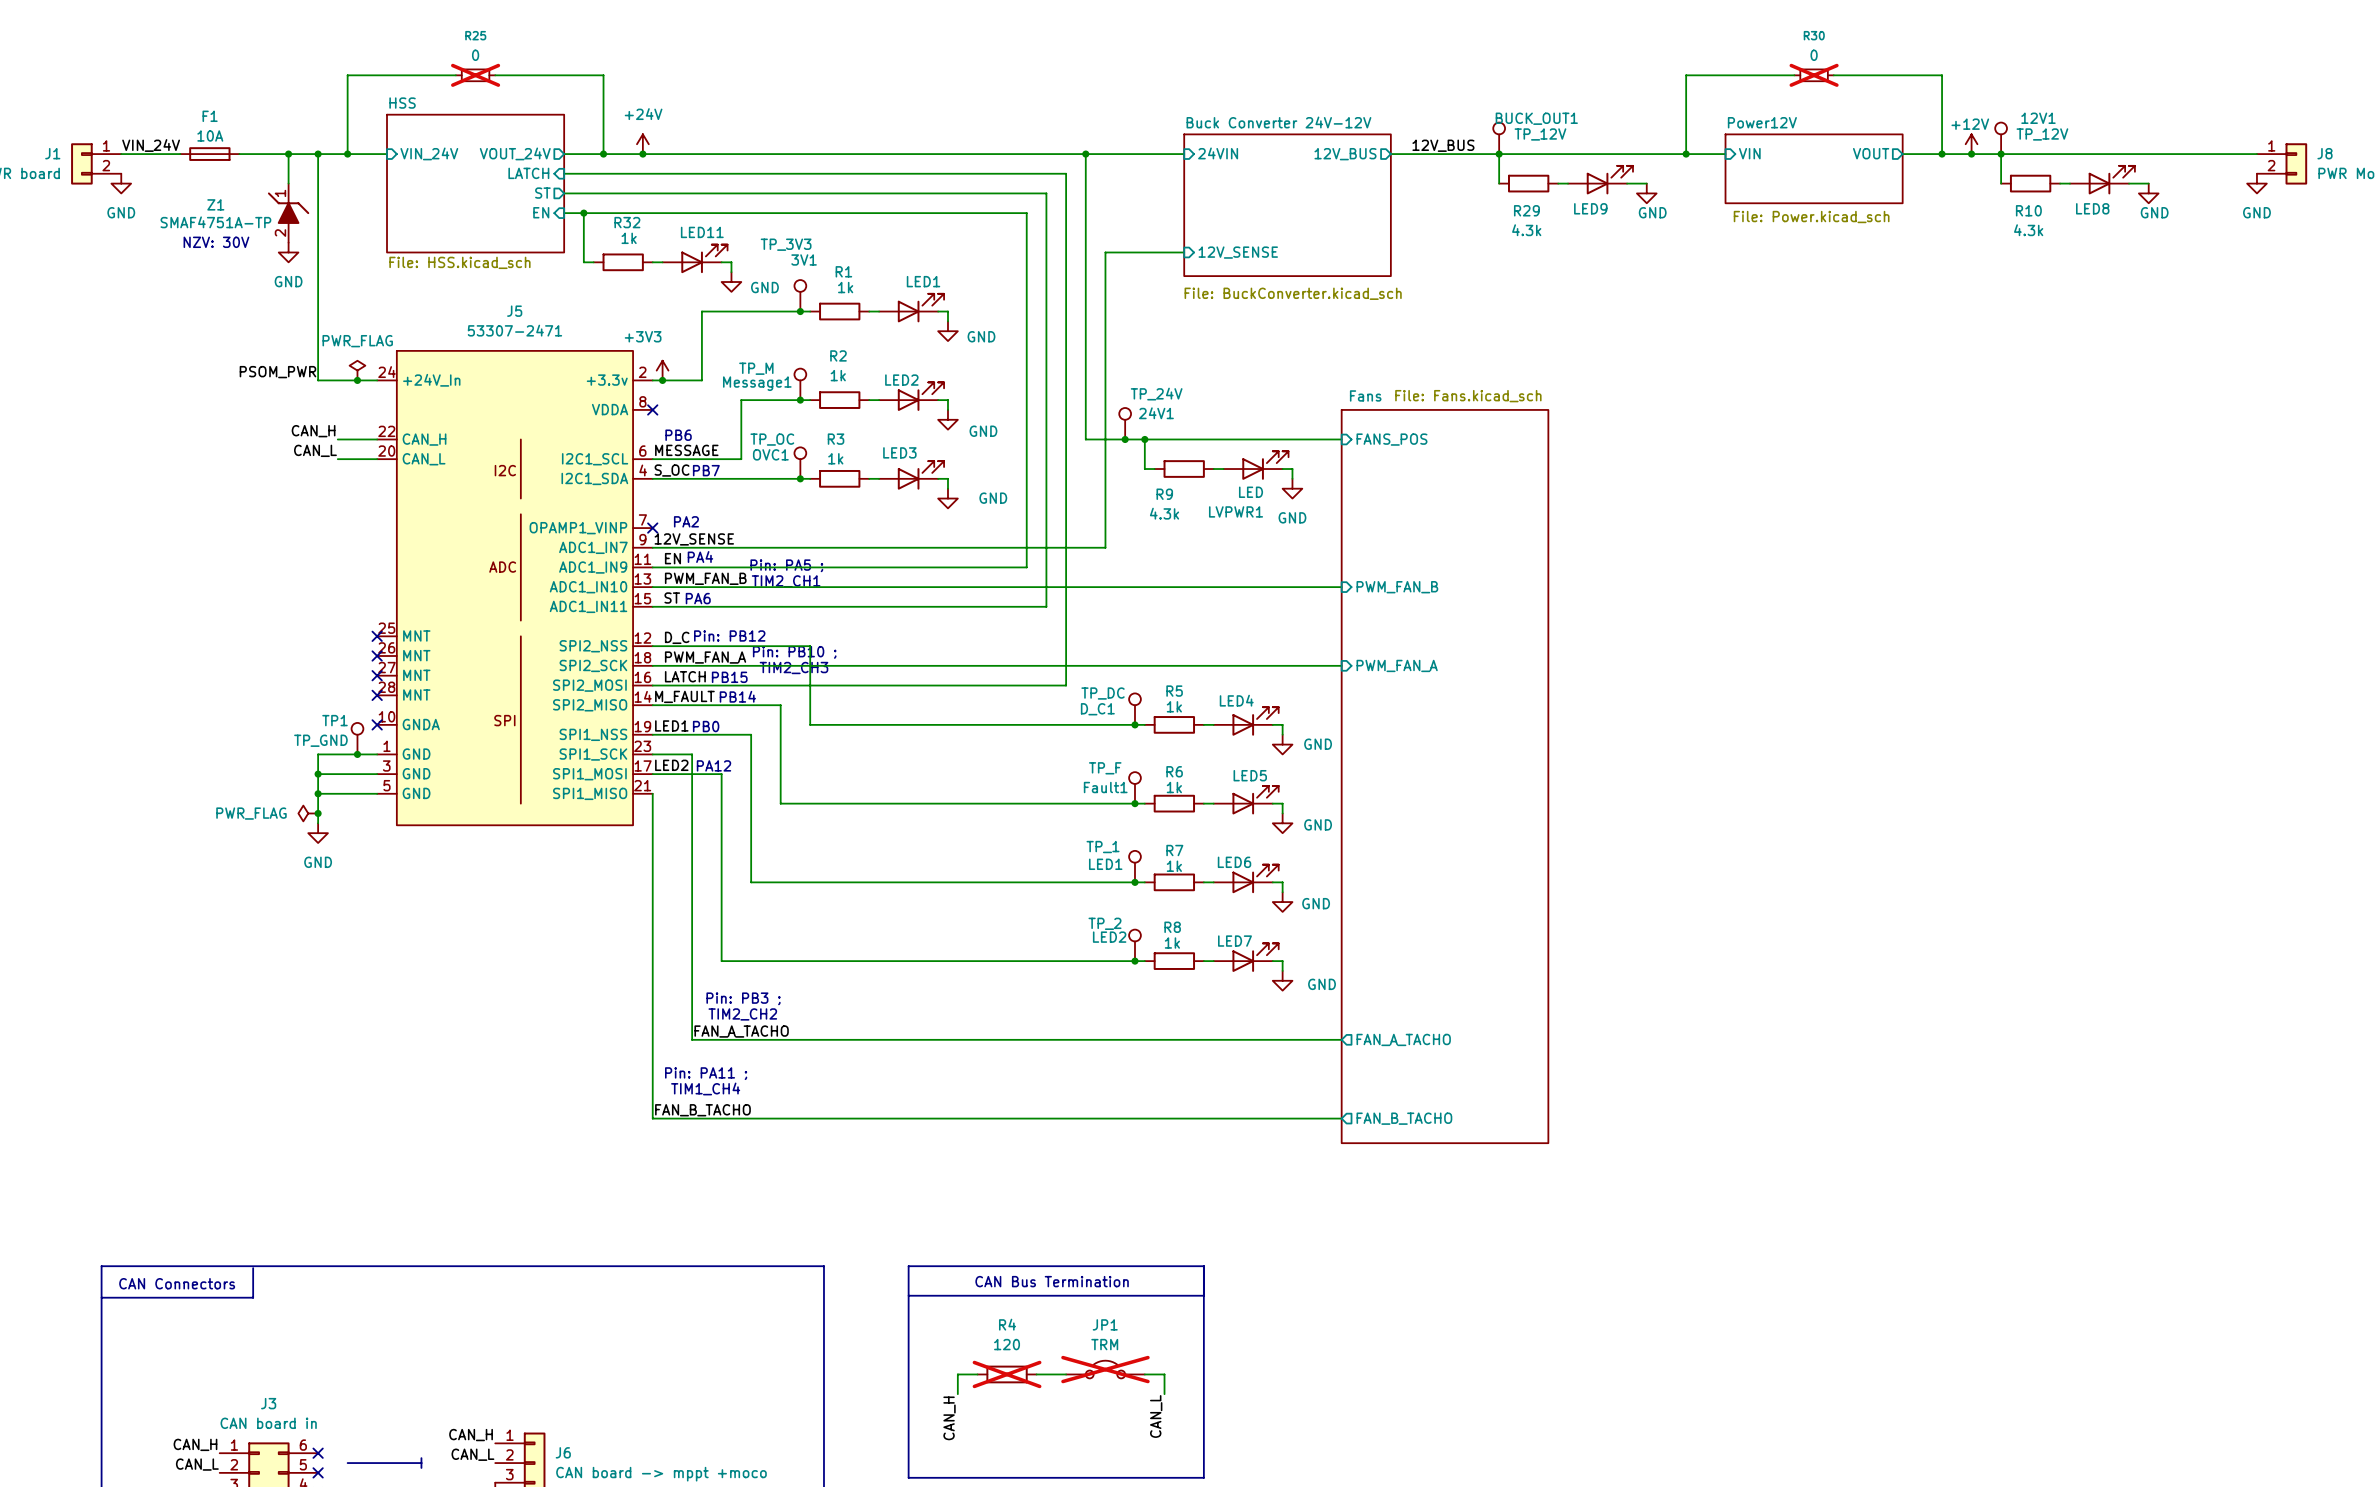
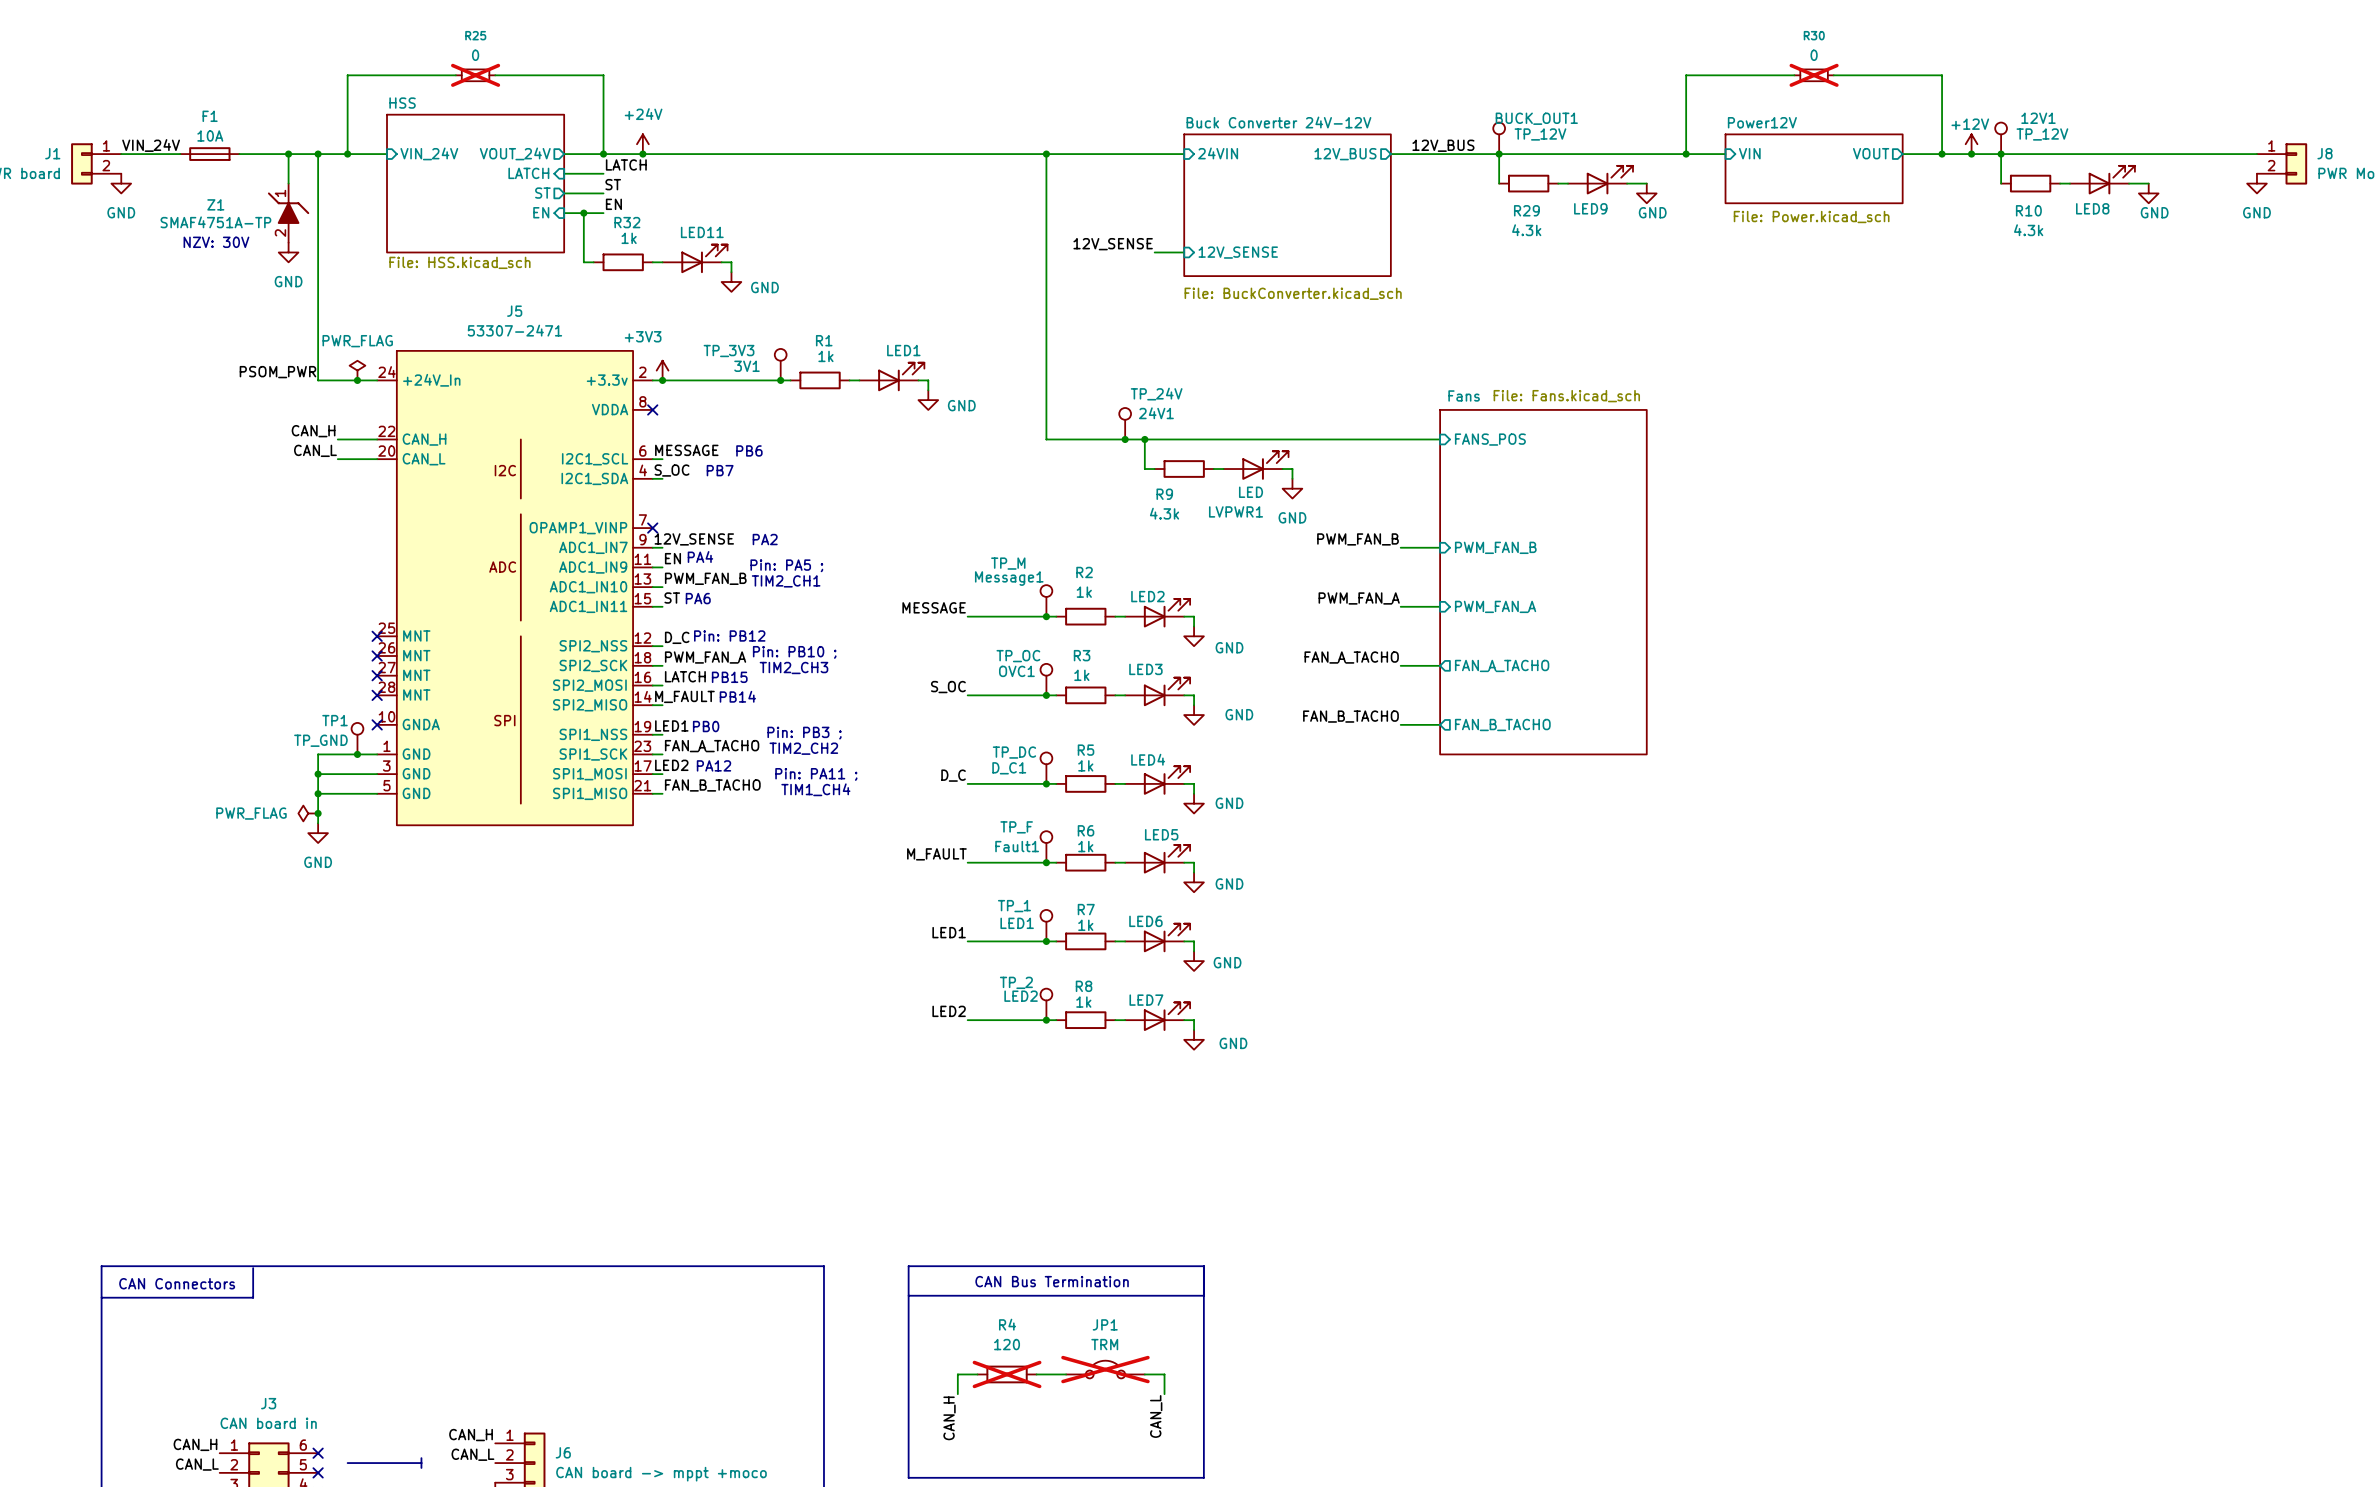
wire: (1085, 154) (1085, 439) -> (1046, 439) (1085, 439)
junction position: (1085, 154) -> (1046, 154)
label: none -> LATCH (626, 164)
wire: (603, 173) (1066, 173) (1066, 685) (662, 685) -> none
label: none -> ST (613, 184)
wire: (603, 193) (1046, 193) -> (1046, 154) (1046, 193)
label: none -> EN (613, 204)
wire: (603, 213) (1026, 213) (1026, 567) (662, 567) -> none
3V1 value position: TP_3V3 (786, 244) -> TP_3V3 (729, 351)
label: none -> 12V_SENSE (1113, 244)
wire: (1154, 252) (1105, 252) (1105, 547) (662, 547) -> none
3V1 name position: 3V1 (804, 259) -> 3V1 (746, 366)
3V1 position: (800, 295) -> (780, 364)
LED1 position: (911, 308) -> (891, 376)
junction: (800, 311) -> none
wire: (810, 311) (701, 311) (701, 380) -> (790, 380) (701, 380)
R1 position: (839, 311) -> (820, 380)
wire: (869, 311) (879, 311) -> none
wire: (938, 311) (947, 311) (947, 321) -> none
power symbol: GND (947, 331) -> none
Message1 value position: TP_M (756, 368) -> TP_M (1008, 563)
Message1 name position: Message1 (757, 383) -> Message1 (1009, 578)
Message1 position: (800, 384) -> (1046, 600)
LED2 position: (911, 396) -> (1157, 613)
junction position: (800, 400) -> (780, 380)
wire: (810, 400) (741, 400) (741, 459) (662, 459) -> none
R2 position: (839, 400) -> (1085, 616)
wire: (869, 400) (879, 400) -> (849, 380) (859, 380)
wire: (938, 400) (947, 400) (947, 409) -> (918, 380) (928, 380) (928, 390)
power symbol position: GND (947, 419) -> GND (928, 400)
power symbol text position: GND (983, 431) -> GND (961, 405)
text position: PB6 (678, 435) -> PB6 (749, 450)
wire: (1046, 439) (1046, 606) (662, 606) -> none
wire: none -> (1341, 439) (1440, 439)
sheet pin position: FANS_POS (1391, 439) -> FANS_POS (1490, 439)
OVC1 position: (800, 463) -> (1046, 679)
text position: PB7 (706, 470) -> PB7 (720, 470)
LED3 position: (911, 475) -> (1157, 691)
wire: (662, 478) (810, 478) -> none
junction: (800, 478) -> none
R3 position: (839, 478) -> (1085, 695)
wire: (869, 478) (879, 478) -> none
wire: (938, 478) (947, 478) (947, 488) -> none
power symbol: GND (947, 498) -> none
text position: PA2 (686, 521) -> PA2 (765, 539)
label: none -> PWM_FAN_B (1358, 539)
wire: none -> (1400, 547) (1440, 547)
sheet Fans: none -> File: Fans.kicad_sch (1543, 582)
wire: (662, 587) (1341, 587) -> none
sheet pin position: PWM_FAN_B (1397, 587) -> PWM_FAN_B (1495, 547)
label: none -> PWM_FAN_A (1359, 598)
wire: none -> (1400, 606) (1440, 606)
label: none -> MESSAGE (934, 607)
wire: none -> (967, 616) (1056, 616)
junction: none -> (1046, 616)
wire: none -> (1115, 616) (1125, 616)
wire: none -> (1184, 616) (1194, 616) (1194, 626)
power symbol: none -> GND (1194, 636)
wire: (662, 646) (810, 646) (810, 724) (1144, 724) -> none
label: none -> FAN_A_TACHO (1351, 657)
wire: (662, 665) (1341, 665) -> none
sheet pin position: PWM_FAN_A (1397, 665) -> PWM_FAN_A (1495, 606)
wire: none -> (1400, 665) (1440, 665)
sheet pin: none -> FAN_A_TACHO (1502, 665)
label: none -> S_OC (948, 687)
wire: none -> (967, 695) (1056, 695)
junction: none -> (1046, 695)
wire: none -> (1115, 695) (1125, 695)
wire: none -> (1184, 695) (1194, 695) (1194, 705)
wire: (662, 705) (780, 705) (780, 803) (1144, 803) -> none
D_C1 position: (1134, 709) -> (1046, 768)
power symbol: none -> GND (1194, 715)
label: none -> FAN_B_TACHO (1350, 716)
LED4 position: (1246, 721) -> (1157, 780)
junction: (1134, 724) -> none
R5 position: (1174, 724) -> (1085, 783)
wire: (1203, 724) (1213, 724) -> (1115, 783) (1125, 783)
wire: (1272, 724) (1282, 724) (1282, 734) -> (1184, 783) (1194, 783) (1194, 793)
wire: none -> (1400, 724) (1440, 724)
sheet pin: none -> FAN_B_TACHO (1502, 725)
text: none -> Pin: PB3 ; (804, 733)
wire: (662, 734) (751, 734) (751, 882) (1144, 882) -> none
power symbol: GND (1282, 744) -> none
label: none -> FAN_A_TACHO (712, 746)
text: none -> TIM2_CH2 (803, 748)
wire: (662, 754) (692, 754) (692, 1039) (1341, 1039) -> none
wire: (662, 774) (721, 774) (721, 961) (1144, 961) -> none
text: none -> Pin: PA11 ; (816, 774)
label: none -> D_C (953, 775)
sheet Fans: File: Fans.kicad_sch (1445, 776) -> none
wire: none -> (967, 783) (1056, 783)
junction: none -> (1046, 783)
label: none -> FAN_B_TACHO (712, 785)
Fault1 position: (1134, 787) -> (1046, 846)
text: none -> TIM1_CH4 (815, 789)
wire: (652, 793) (652, 1118) (1341, 1118) -> (652, 793) (662, 793)
LED5 position: (1246, 800) -> (1157, 859)
junction: (1134, 803) -> none
R6 position: (1174, 803) -> (1085, 862)
power symbol: none -> GND (1194, 803)
wire: (1203, 803) (1213, 803) -> (1115, 862) (1125, 862)
wire: (1272, 803) (1282, 803) (1282, 813) -> (1184, 862) (1194, 862) (1194, 872)
power symbol: GND (1282, 823) -> none
label: none -> M_FAULT (936, 854)
wire: none -> (967, 862) (1056, 862)
junction: none -> (1046, 862)
TP_1 position: (1134, 866) -> (1046, 925)
LED6 position: (1246, 878) -> (1157, 937)
junction: (1134, 882) -> none
R7 position: (1174, 882) -> (1085, 941)
power symbol: none -> GND (1194, 882)
wire: (1203, 882) (1213, 882) -> (1115, 941) (1125, 941)
wire: (1272, 882) (1282, 882) (1282, 892) -> (1184, 941) (1194, 941) (1194, 951)
power symbol: GND (1282, 902) -> none
label: none -> LED1 (949, 932)
wire: none -> (967, 941) (1056, 941)
junction: none -> (1046, 941)
TP_2 position: (1134, 945) -> (1046, 1004)
LED7 position: (1246, 957) -> (1157, 1016)
junction: (1134, 961) -> none
R8 position: (1174, 961) -> (1085, 1020)
power symbol: none -> GND (1194, 961)
wire: (1203, 961) (1213, 961) -> (1115, 1020) (1125, 1020)
wire: (1272, 961) (1282, 961) (1282, 970) -> (1184, 1020) (1194, 1020) (1194, 1030)
power symbol: GND (1282, 980) -> none
text: Pin: PB3 ; (743, 998) -> none
label: none -> LED2 (949, 1011)
text: TIM2_CH2 (742, 1014) -> none
wire: none -> (967, 1020) (1056, 1020)
junction: none -> (1046, 1020)
label: FAN_A_TACHO (741, 1031) -> none
power symbol: none -> GND (1194, 1039)
sheet pin: FAN_A_TACHO (1403, 1039) -> none
text: Pin: PA11 ; (706, 1073) -> none
text: TIM1_CH4 (705, 1089) -> none
label: FAN_B_TACHO (702, 1110) -> none
sheet pin: FAN_B_TACHO (1404, 1118) -> none

